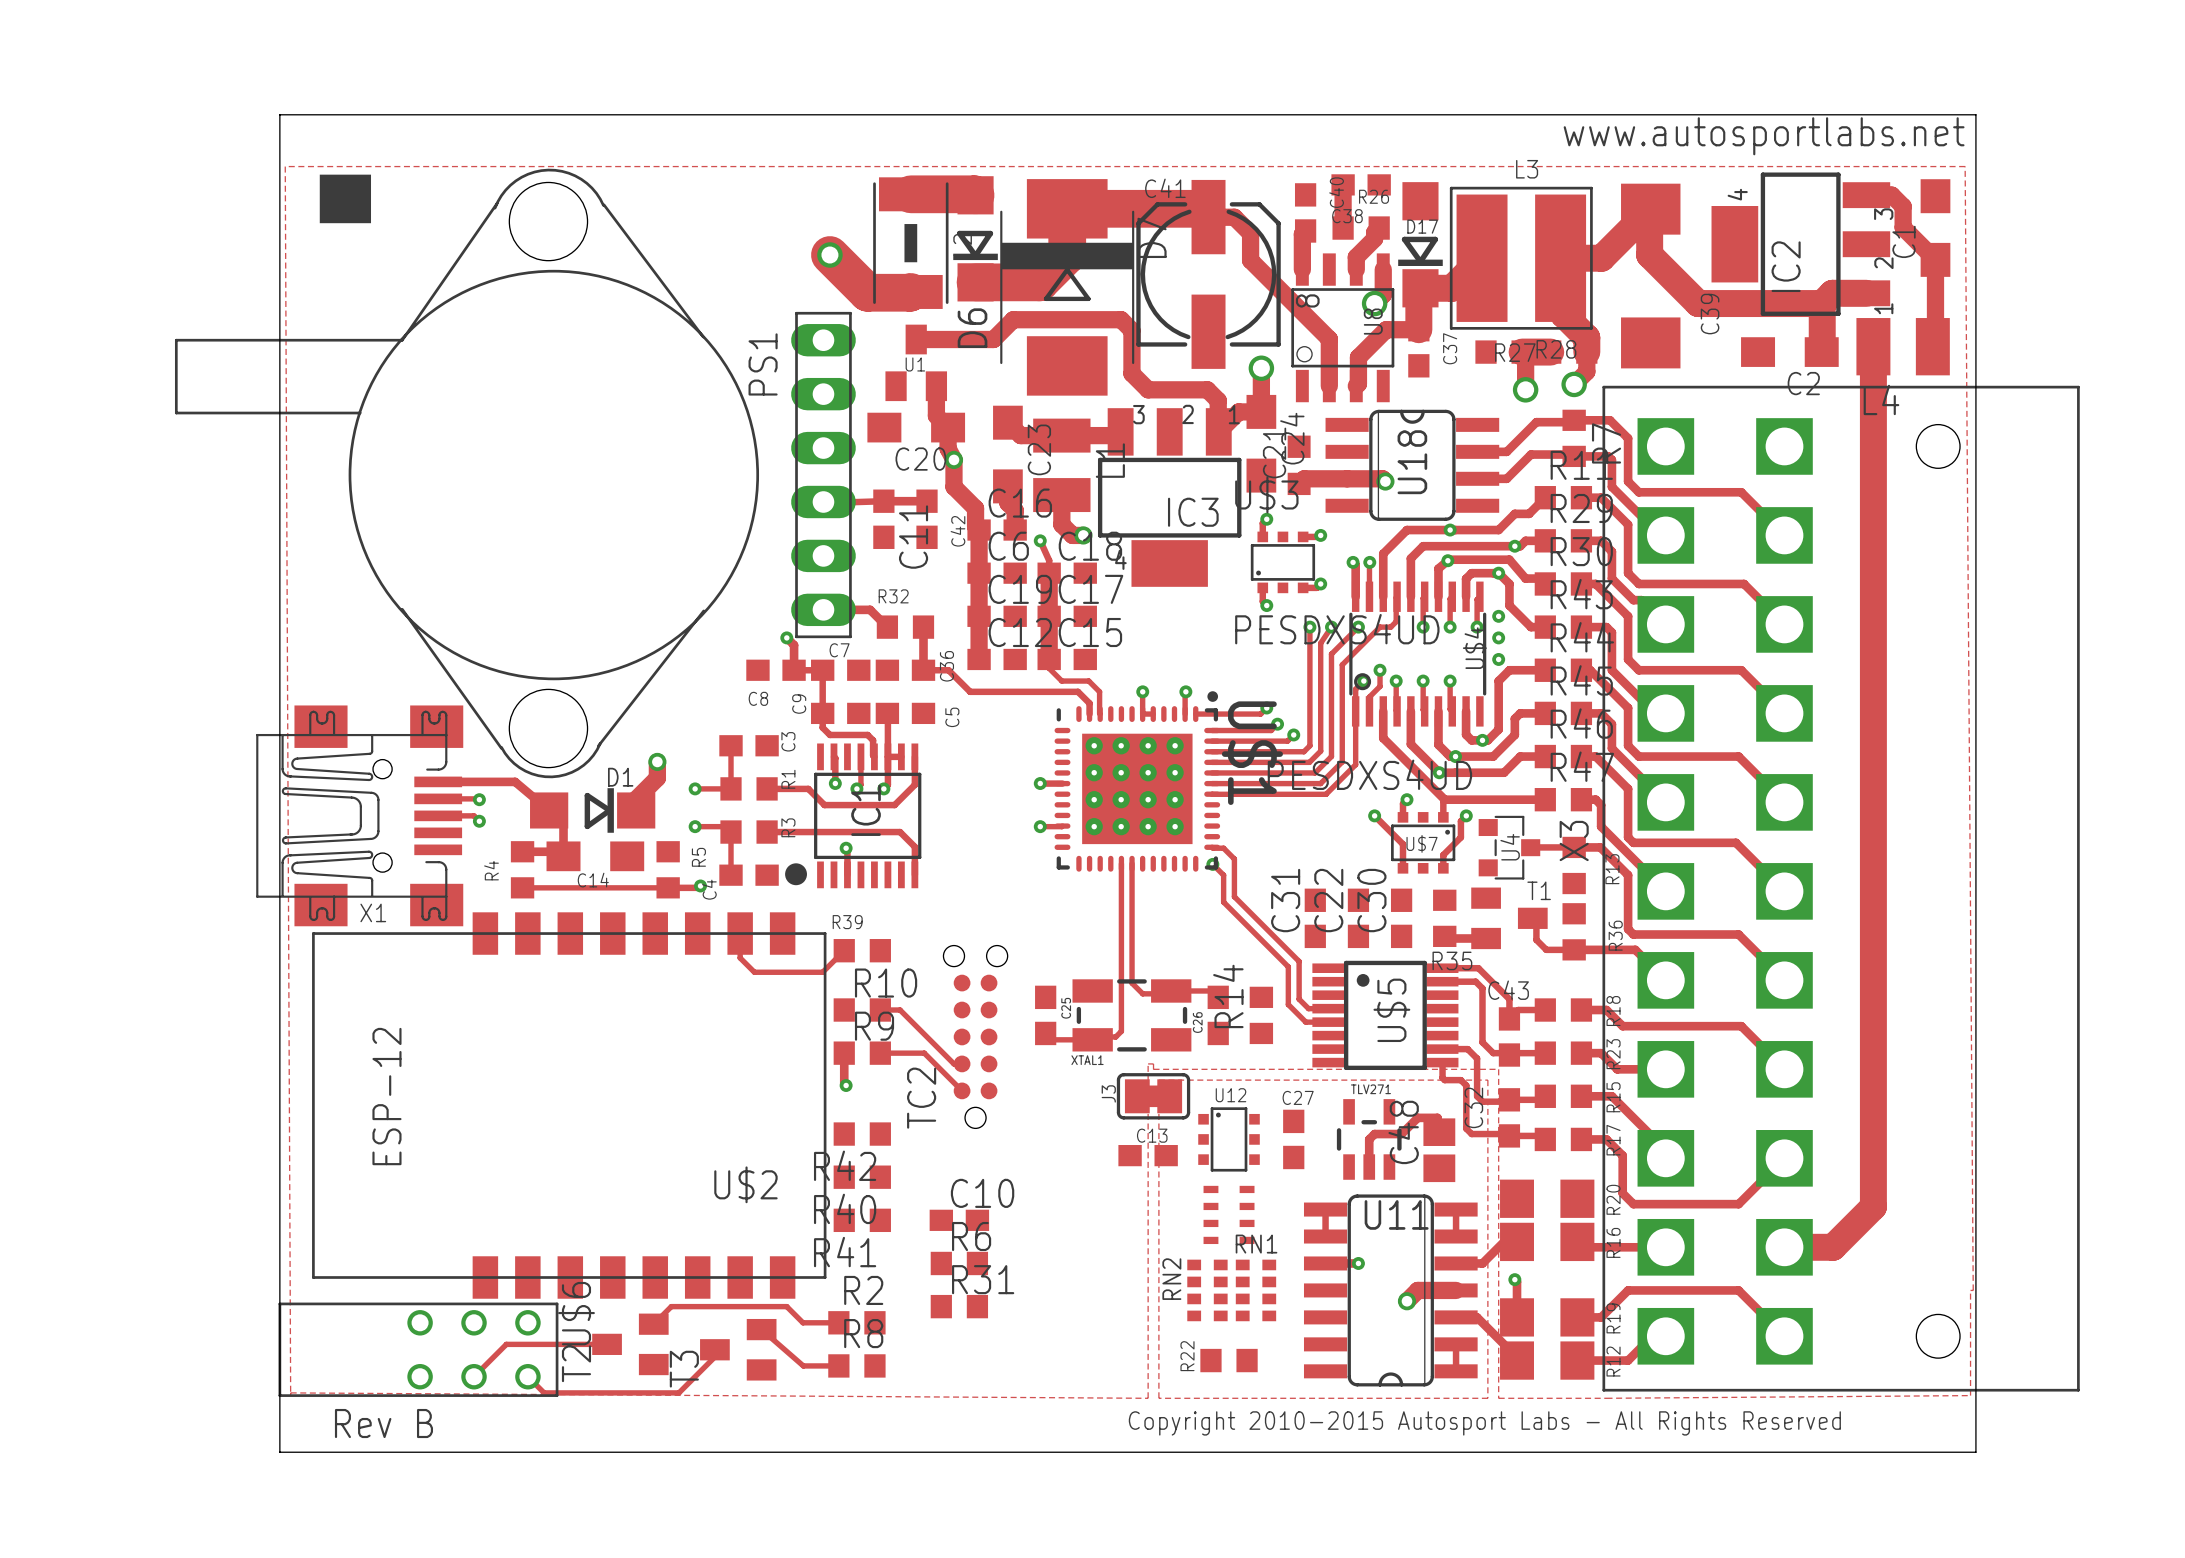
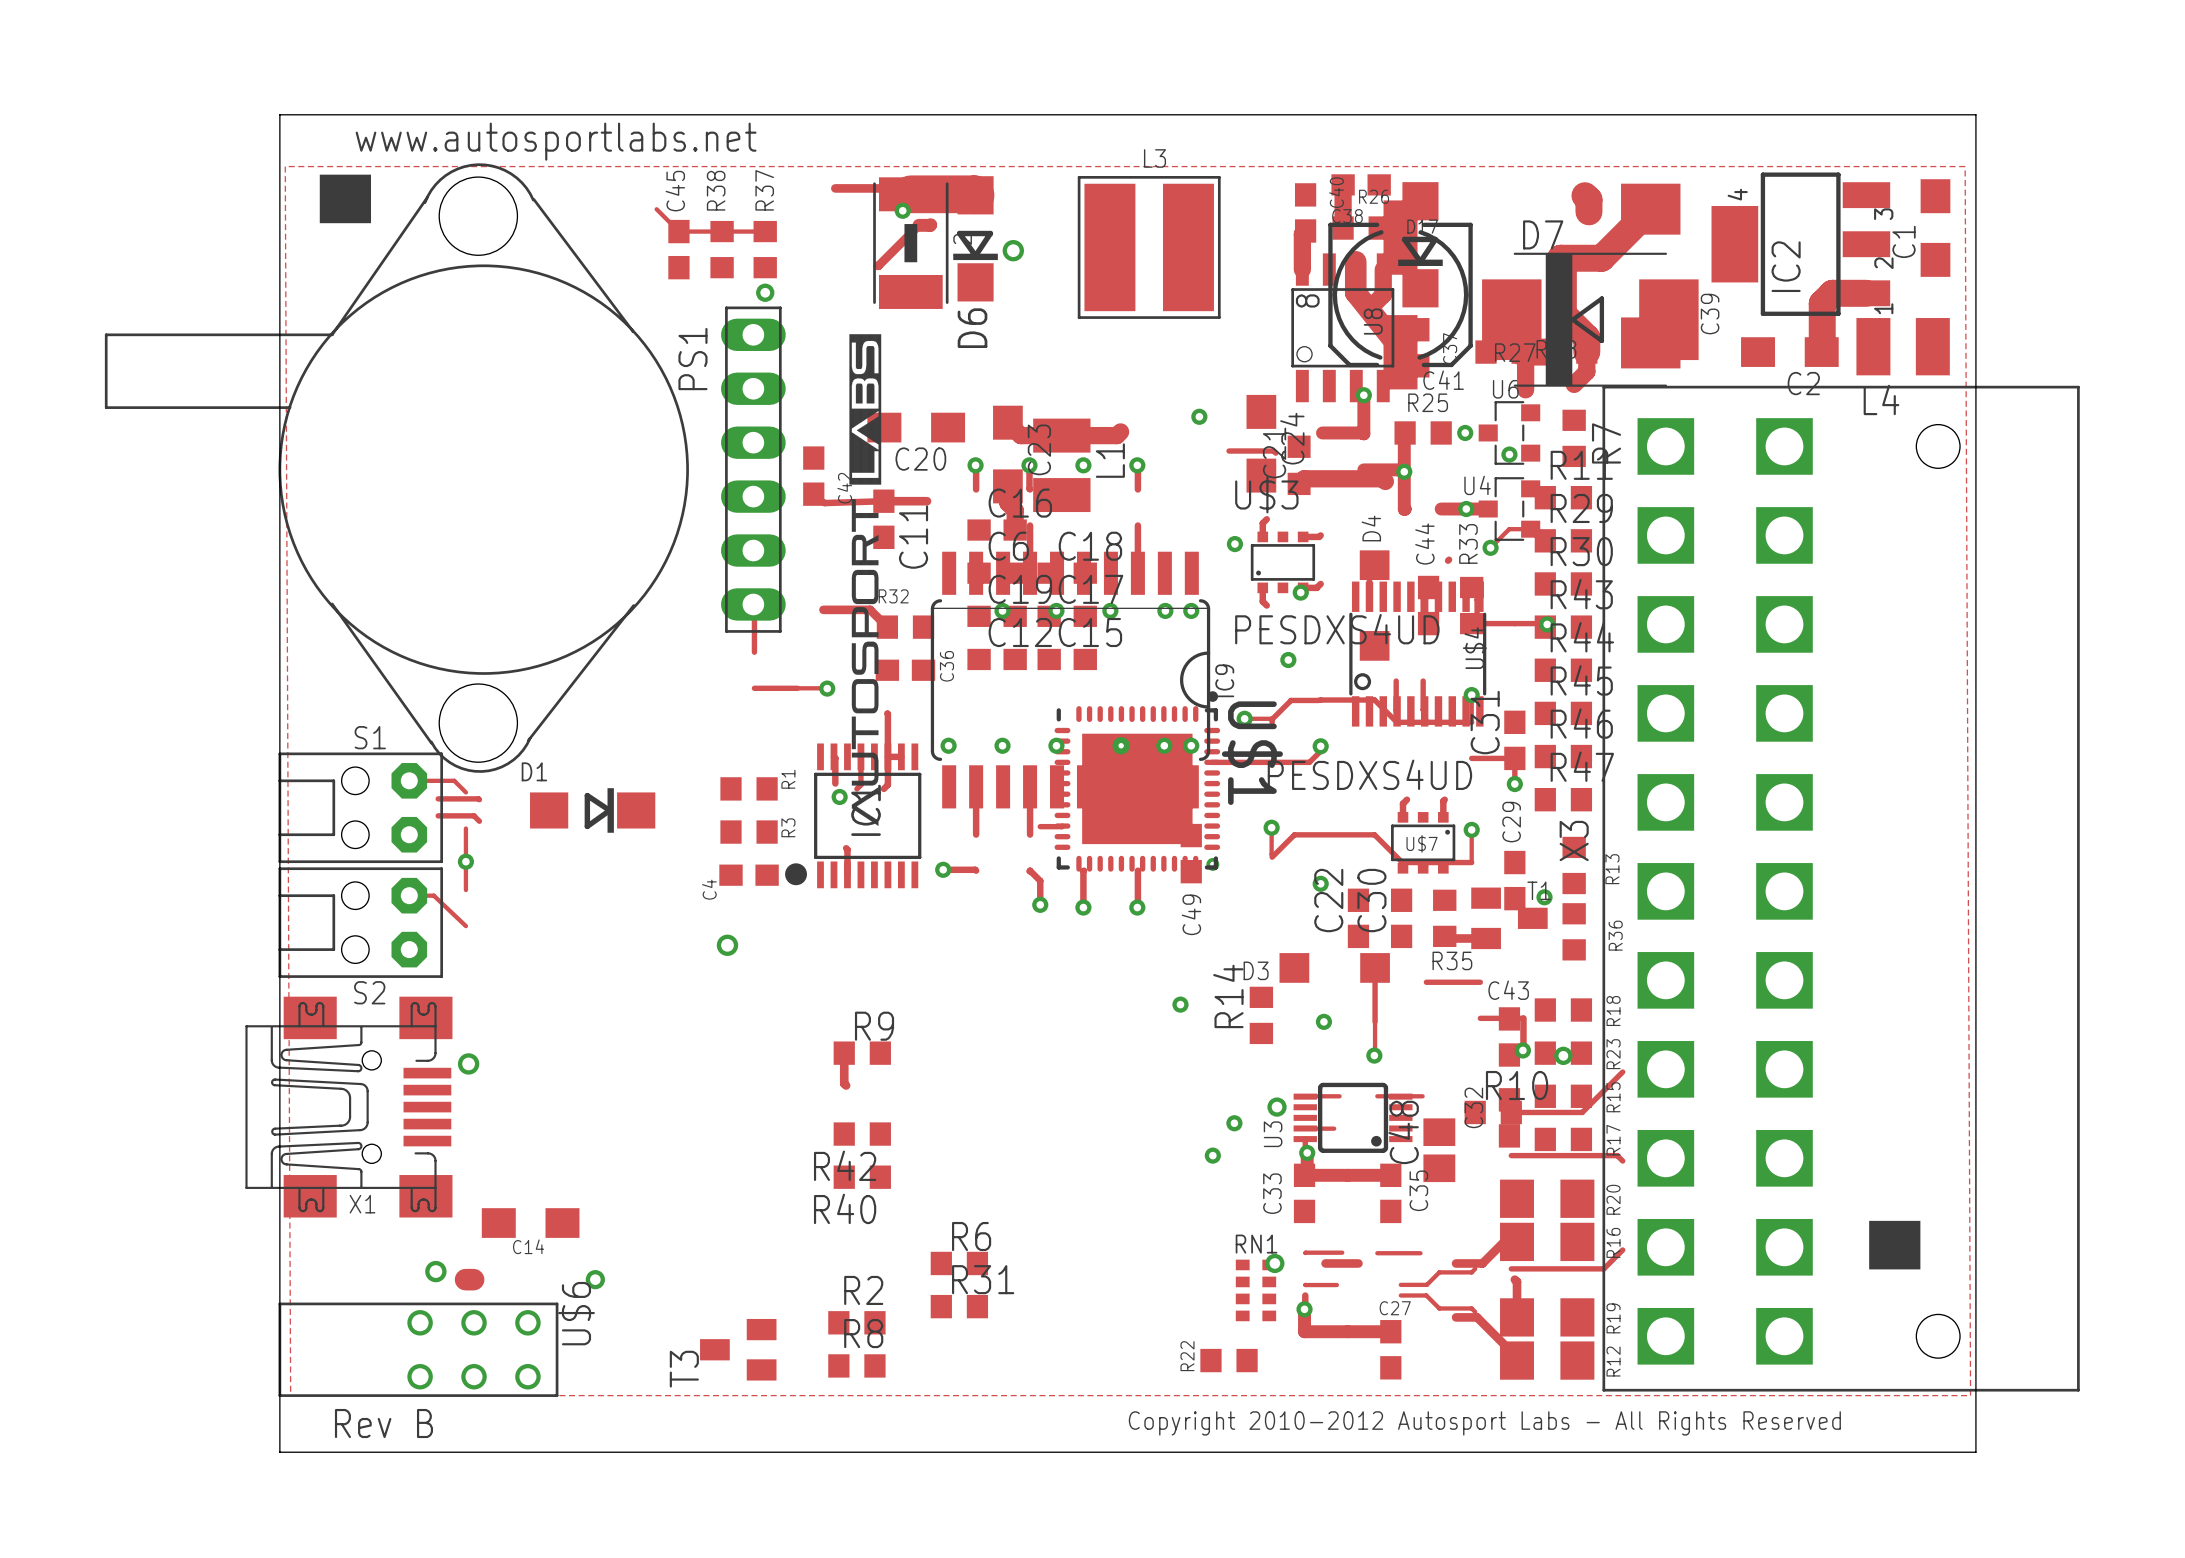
text: www.autosportlabs.net (1764, 136) -> none
text: none -> www.autosportlabs.net (556, 141)
zone outline: (1965, 166) (1973, 1290) (1970, 1290) (1970, 1395) (1498, 1398) (1498, 1069) (1153, 1069) (1153, 1063) (1148, 1063) (1148, 1398) (290, 1392) (290, 1395) -> (1965, 166) (1970, 1395) (290, 1395)
track: none -> (835, 188) (921, 188) (930, 197)
track: none -> (1584, 195) (1588, 199) (1588, 211)
track: (1866, 195) (1891, 195) (1903, 206) (1903, 227) (1935, 259) (1935, 344) (1932, 346) -> none
track: none -> (656, 209) (678, 231) (765, 231)
via: none -> (902, 210)
track: (1649, 210) (1649, 255) (1698, 303) (1822, 303) -> none
track: (1208, 217) (1200, 208) (1067, 208) (1067, 255) (1039, 282) (975, 282) -> none
track: (1208, 217) (1234, 217) (1250, 233) (1250, 260) (1329, 339) (1329, 386) -> none
track: none -> (930, 224) (918, 225) (877, 265)
track: (1379, 228) (1374, 232) (1374, 238) (1356, 257) (1356, 269) -> none
C45: none -> (678, 249)
R38: none -> (722, 249)
R37: none -> (765, 249)
via: none -> (1013, 250)
track: (829, 255) (867, 292) (910, 291) -> none
via: (829, 255) -> none
track: (1482, 258) (1451, 288) (1420, 288) (1418, 289) (1418, 329) (1386, 329) (1358, 357) (1358, 383) (1356, 386) -> none
L3 position: (1521, 258) -> (1149, 247)
track: none -> (1355, 261) (1355, 292) (1397, 345) (1400, 352)
C41 rotation: 0° (1208, 274) -> 180° (1400, 294)
C41 position: (1208, 274) -> (1400, 294)
D7 rotation: 0° (1067, 287) -> 90° counterclockwise (1590, 319)
D7 position: (1067, 287) -> (1590, 319)
via: none -> (765, 292)
via: (1374, 303) -> none
drawing: none -> [849, 334, 882, 827]
track: (916, 339) (993, 339) (1013, 319) (1121, 319) (1131, 330) (1131, 373) (1148, 389) (1207, 389) (1218, 400) (1218, 431) (1238, 411) (1261, 411) (1261, 368) -> none
track: (1873, 346) (1873, 1206) (1833, 1247) (1784, 1247) -> none
U1: (916, 362) -> none
via: (1261, 368) -> none
via: (1574, 384) -> none
track: (936, 386) (936, 415) (948, 427) (948, 448) (953, 459) (953, 486) (975, 508) (975, 526) (979, 530) (979, 659) -> none
via: (1525, 389) -> none
track: none -> (1363, 395) (1363, 433) (1322, 432)
via: none -> (1363, 395)
via: none -> (1199, 416)
track: none -> (1405, 432) (1404, 509)
R25: none -> (1423, 432)
via: none -> (1465, 432)
U6: none -> (1509, 432)
track: none -> (1229, 451) (1273, 451) (1275, 453)
track: (1477, 451) (1506, 451) (1536, 422) (1610, 420) (1628, 438) (1628, 481) (1638, 492) (1741, 492) (1784, 535) -> none
via: none -> (1509, 454)
via: (953, 459) -> none
track: none -> (975, 465) (976, 463) (976, 489)
via: none -> (975, 465)
track: none -> (1029, 465) (1030, 489)
via: none -> (1029, 465)
via: none -> (1083, 465)
track: none -> (1137, 465) (1137, 463) (1137, 489)
via: none -> (1137, 465)
U18: (1412, 465) -> none
track: none -> (1363, 469) (1402, 469) (1404, 471)
via: none -> (1404, 471)
PS1 position: (515, 473) -> (445, 468)
track: (1477, 478) (1506, 478) (1531, 454) (1608, 456) (1611, 459) (1611, 486) (1644, 519) (1649, 519) (1665, 535) -> none
via: (1385, 481) -> none
track: (1061, 495) (1061, 524) (1072, 535) (1083, 535) -> none
IC3: (1169, 497) -> none
track: (1545, 497) (1529, 513) (1514, 513) (1498, 530) (1406, 530) (1383, 553) (1383, 596) -> none
track: (1581, 497) (1601, 497) (1628, 524) (1628, 573) (1638, 583) (1744, 583) (1784, 624) -> none
track: none -> (1441, 509) (1488, 509)
via: none -> (1466, 509)
C42 position: (927, 519) -> (813, 476)
via: (1266, 519) -> none
track: none -> (1030, 525) (1030, 573)
track: none -> (1137, 525) (1137, 573)
track: none -> (1530, 529) (1509, 529) (1490, 547)
via: (1450, 530) -> none
via: (1083, 535) -> none
via: (1320, 535) -> none
track: (1040, 540) (1049, 560) (1049, 668) (1061, 681) (1088, 681) (1099, 691) (1100, 714) -> none
via: (1040, 540) -> none
track: (1545, 540) (1525, 540) (1520, 546) (1423, 546) (1410, 558) (1410, 596) -> none
track: (1581, 540) (1601, 540) (1611, 551) (1611, 578) (1633, 600) (1641, 600) (1665, 624) -> none
via: none -> (1234, 544)
via: (1514, 546) -> none
via: none -> (1490, 547)
via: (1447, 560) -> none
track: (1353, 562) (1355, 565) (1355, 596) -> none
via: (1353, 562) -> none
via: (1369, 562) -> none
via: (1498, 573) -> none
via: (1320, 583) -> none
track: (1545, 583) (1539, 578) (1525, 578) (1509, 559) (1449, 559) (1438, 568) (1438, 596) -> none
track: (1581, 583) (1595, 583) (1628, 616) (1628, 659) (1638, 670) (1741, 670) (1784, 713) -> none
via: none -> (1300, 592)
track: (1397, 596) (1396, 621) (1390, 627) (1380, 627) (1342, 664) (1342, 761) (1320, 783) (1212, 783) -> none
track: (1452, 596) (1450, 598) (1450, 627) -> none
track: (1466, 596) (1466, 578) (1471, 573) (1498, 573) (1509, 583) (1509, 605) (1531, 627) (1545, 627) -> none
track: none -> (753, 604) (754, 652)
via: (1266, 605) -> none
D4: none -> (1374, 605)
C44: none -> (1428, 605)
R33: none -> (1471, 605)
via: none -> (1002, 610)
via: none -> (1056, 610)
via: none -> (1110, 610)
via: none -> (1165, 610)
via: none -> (1191, 610)
via: (1498, 616) -> none
track: none -> (1471, 623) (1547, 624)
via: none -> (1547, 624)
track: (923, 627) (923, 670) (948, 670) (970, 691) (1078, 691) (1089, 703) (1089, 714) -> none
track: (1309, 627) (1309, 745) (1303, 751) (1212, 751) -> none
via: (1309, 627) -> none
track: (1331, 627) (1320, 643) (1320, 746) -> none
via: (1331, 627) -> none
track: (1358, 627) (1331, 654) (1331, 756) (1315, 772) (1212, 772) -> none
via: (1358, 627) -> none
via: (1423, 627) -> none
via: (1450, 627) -> none
via: (1477, 627) -> none
track: (1581, 627) (1606, 627) (1611, 632) (1611, 670) (1649, 708) (1660, 708) (1665, 713) -> none
track: (786, 637) (794, 645) (794, 670) (822, 670) (822, 727) (829, 734) (867, 734) (873, 740) (874, 756) -> none
via: (786, 637) -> none
via: (1498, 637) -> none
via: (1498, 659) -> none
via: none -> (1288, 660)
C8: (776, 670) -> none
C7: (840, 670) -> none
track: (1380, 670) (1380, 686) (1369, 697) (1369, 711) -> none
via: (1380, 670) -> none
track: (1545, 670) (1509, 670) (1498, 681) (1498, 729) (1487, 740) (1471, 740) (1466, 734) (1466, 711) -> none
track: (1581, 670) (1590, 670) (1628, 708) (1628, 745) (1638, 756) (1738, 756) (1784, 802) -> none
IC9: none -> (1070, 680)
track: (1363, 681) (1355, 689) (1355, 764) (1326, 794) (1212, 794) -> none
via: (1363, 681) -> none
via: (1396, 681) -> none
via: (1423, 681) -> none
track: (1450, 681) (1450, 709) (1452, 711) -> none
via: (1450, 681) -> none
track: none -> (754, 688) (826, 688)
via: none -> (827, 688)
track: (1142, 691) (1142, 714) (1153, 714) -> none
via: (1142, 691) -> none
track: (1185, 691) (1185, 714) -> none
via: (1185, 691) -> none
track: none -> (1471, 695) (1471, 722) (1396, 722) (1374, 700) (1291, 700) (1272, 719) (1272, 722) (1270, 718) (1244, 718)
via: none -> (1471, 695)
track: (1266, 708) (1260, 714) (1195, 714) -> none
via: (1266, 708) -> none
track: (1383, 711) (1383, 738) (1444, 799) (1545, 799) -> none
track: (1410, 711) (1410, 744) (1439, 772) (1504, 772) (1520, 756) (1545, 756) -> none
track: (1438, 711) (1438, 744) (1450, 756) (1493, 756) (1514, 734) (1514, 718) (1520, 713) (1545, 713) -> none
C9: (840, 713) -> none
C5: (905, 713) -> none
track: (1581, 713) (1601, 713) (1611, 724) (1611, 748) (1665, 802) -> none
via: none -> (1244, 718)
track: (1277, 724) (1271, 730) (1212, 730) -> none
via: (1277, 724) -> none
track: (1293, 734) (1287, 741) (1212, 741) -> none
via: (1293, 734) -> none
via: (1482, 740) -> none
track: (731, 745) (731, 788) (695, 788) -> none
C3: (749, 745) -> none
via: none -> (948, 745)
via: none -> (1002, 745)
via: none -> (1056, 745)
via: (1094, 745) -> none
via: (1148, 745) -> none
via: none -> (1164, 745)
via: (1175, 745) -> none
via: none -> (1191, 745)
via: none -> (1320, 746)
track: (914, 756) (914, 784) (894, 805) (824, 805) (808, 788) (767, 788) -> none
via: (1455, 756) -> none
track: (1581, 756) (1595, 756) (1628, 788) (1628, 837) (1633, 842) (1735, 842) (1784, 891) -> none
track: none -> (1471, 758) (1514, 758) (1514, 784)
track: (657, 761) (657, 778) (636, 799) (636, 810) -> none
via: (657, 761) -> none
via: (1094, 772) -> none
via: (1121, 772) -> none
via: (1148, 772) -> none
via: (1175, 772) -> none
via: (1439, 772) -> none
D1 name position: D1 (620, 777) -> D1 (534, 771)
track: none -> (409, 780) (454, 780) (465, 792)
track: (438, 781) (515, 781) (549, 810) (563, 819) (563, 856) (562, 851) (522, 851) -> none
via position: (835, 783) -> (839, 796)
track: (1040, 783) (1062, 783) -> none
via: (1040, 783) -> none
via: none -> (1514, 784)
track: none -> (976, 786) (976, 834)
track: none -> (1030, 786) (1030, 834)
via: (695, 788) -> none
via: (856, 788) -> none
via: (883, 788) -> none
via: (479, 799) -> none
via: (1094, 799) -> none
via: (1121, 799) -> none
via: (1148, 799) -> none
via: (1175, 799) -> none
via: (1406, 799) -> none
track: (1581, 799) (1595, 799) (1601, 805) (1601, 826) (1665, 891) -> none
S1: none -> (360, 807)
X1 position: (359, 815) -> (348, 1107)
track: (1374, 815) (1402, 844) (1402, 868) -> none
via: (1374, 815) -> none
track: (1466, 815) (1460, 821) (1460, 837) (1443, 855) (1443, 868) -> none
via position: (1466, 815) -> (1471, 829)
via: (479, 821) -> none
track: (695, 826) (725, 826) (731, 832) (731, 875) -> none
via: (695, 826) -> none
via: (1040, 826) -> none
via: (1094, 826) -> none
via: (1121, 826) -> none
via: (1148, 826) -> none
via: (1175, 826) -> none
track: none -> (1271, 827) (1272, 857) (1294, 834) (1374, 834) (1402, 862) (1471, 862) (1471, 829)
via: none -> (1271, 827)
track: none -> (465, 828) (465, 890)
track: (767, 832) (900, 832) (914, 846) (914, 874) -> none
track: (1212, 847) (1223, 848) (1234, 859) (1234, 896) (1299, 961) (1299, 999) (1308, 1008) (1328, 1008) -> none
U4 rotation: 0° (1509, 847) -> 180° (1509, 509)
U4 position: (1509, 847) -> (1509, 509)
track: (1530, 847) (1600, 847) (1628, 875) (1628, 929) (1633, 934) (1738, 934) (1784, 980) -> none
via: (846, 848) -> none
C49: none -> (1191, 853)
C14 position: (595, 856) -> (530, 1223)
via: none -> (465, 861)
track: (1121, 863) (1121, 1031) (1115, 1036) (1095, 1036) (1092, 1039) (1052, 1039) (1045, 1033) -> none
track: (1132, 863) (1132, 983) (1142, 993) (1168, 993) (1171, 990) (1211, 990) (1218, 997) -> none
track: (1212, 864) (1223, 875) (1223, 902) (1288, 966) (1288, 1004) (1305, 1022) (1328, 1022) -> none
R4: (522, 869) -> none
R5: (668, 869) -> none
track: none -> (943, 869) (976, 870)
via: none -> (943, 869)
track: none -> (1083, 870) (1083, 907)
track: none -> (1137, 870) (1137, 907)
track: none -> (1029, 871) (1040, 880) (1040, 904)
C29: none -> (1514, 880)
via: none -> (1320, 883)
track: (700, 885) (698, 887) (522, 887) -> none
via: (700, 885) -> none
track: none -> (409, 895) (433, 895) (465, 926)
via: none -> (1544, 897)
via: none -> (1040, 904)
via: none -> (1083, 907)
via: none -> (1137, 907)
C31 position: (1315, 918) -> (1514, 740)
track: (1532, 918) (1536, 921) (1536, 939) (1546, 949) (1635, 949) (1665, 980) -> none
S2: none -> (360, 922)
track: (740, 933) (740, 957) (754, 972) (822, 972) (844, 950) -> none
via: none -> (727, 945)
R39: (862, 950) -> none
D3: none -> (1334, 967)
track: none -> (1375, 967) (1374, 1055)
track: (1442, 968) (1478, 968) (1509, 999) (1509, 1018) (1518, 1010) (1545, 1010) -> none
track: (1442, 981) (1475, 981) (1482, 988) (1482, 1042) (1493, 1053) (1507, 1053) (1509, 1055) (1511, 1053) (1545, 1053) -> none
track: none -> (1426, 982) (1480, 982)
via: none -> (1180, 1004)
R10 position: (862, 1010) -> (1493, 1112)
track: (880, 1010) (900, 1010) (953, 1063) (962, 1063) -> none
track: (1581, 1010) (1606, 1010) (1622, 1026) (1741, 1026) (1784, 1069) -> none
C25: (1045, 1015) -> none
XTAL1: (1131, 1015) -> none
C26: (1218, 1015) -> none
U$5: (1385, 1015) -> none
track: none -> (1480, 1018) (1523, 1018) (1522, 1050)
via: none -> (1323, 1021)
TC2: (975, 1036) -> none
track: (1442, 1049) (1467, 1049) (1477, 1058) (1477, 1096) (1482, 1101) (1541, 1099) (1545, 1096) -> none
via: none -> (1522, 1050)
track: (880, 1053) (924, 1053) (962, 1090) -> none
track: (1581, 1053) (1601, 1053) (1617, 1069) (1665, 1069) -> none
via: none -> (1374, 1055)
via: none -> (1563, 1055)
track: (1442, 1062) (1442, 1077) (1444, 1080) (1460, 1080) (1466, 1085) (1466, 1128) (1471, 1134) (1541, 1135) (1545, 1139) -> none
via: none -> (468, 1063)
track: none -> (1622, 1072) (1582, 1112) (1511, 1112)
zone outline: (1158, 1080) (1158, 1398) (1487, 1398) (1487, 1080) (1158, 1080) -> none
via: (846, 1085) -> none
J3: (1153, 1096) -> none
track: none -> (1339, 1096) (1305, 1096)
track: none -> (1377, 1096) (1422, 1096)
track: (1581, 1096) (1611, 1096) (1665, 1150) (1665, 1158) -> none
U$2: (569, 1105) -> none
via: none -> (1277, 1107)
U3: none -> (1353, 1117)
via: none -> (1234, 1123)
track: none -> (1305, 1128) (1334, 1128)
track: (1439, 1132) (1437, 1117) (1417, 1117) (1401, 1134) (1374, 1134) (1369, 1139) (1369, 1167) -> none
U12: (1229, 1139) -> none
C27 position: (1293, 1139) -> (1390, 1349)
track: none -> (1305, 1139) (1307, 1172) (1304, 1175) (1390, 1175)
TLV271: (1369, 1139) -> none
track: (1581, 1139) (1606, 1139) (1622, 1155) (1622, 1193) (1633, 1204) (1738, 1204) (1784, 1158) -> none
via: none -> (1307, 1152)
C13: (1148, 1155) -> none
via: none -> (1212, 1155)
track: none -> (1511, 1155) (1617, 1155) (1622, 1161)
C33: none -> (1304, 1193)
C35: none -> (1390, 1193)
track: (1325, 1209) (1325, 1236) -> none
track: (1456, 1209) (1456, 1236) -> none
part: (1229, 1214) -> none
R41: (862, 1220) -> none
C10: (959, 1220) -> none
drawing: none -> [1869, 1220, 1921, 1270]
track: (1577, 1241) (1582, 1247) (1665, 1247) -> none
track: none -> (1622, 1249) (1603, 1268) (1511, 1268)
track: none -> (1342, 1252) (1305, 1253)
track: none -> (1377, 1253) (1420, 1253)
via: none -> (1274, 1263)
via: (1358, 1263) -> none
track: none -> (1475, 1268) (1471, 1272) (1439, 1272) (1426, 1284) (1400, 1284)
via: none -> (435, 1271)
track: none -> (465, 1279) (473, 1279)
via: none -> (595, 1279)
via: (1514, 1279) -> none
track: none -> (1305, 1285) (1336, 1285)
RN2: (1207, 1290) -> none
U11: (1390, 1290) -> none
track: (1456, 1290) (1417, 1290) (1406, 1301) -> none
track: none -> (1305, 1295) (1304, 1331) (1390, 1331)
track: none -> (1400, 1295) (1426, 1295) (1439, 1308) (1471, 1308) (1475, 1312)
via: (1406, 1301) -> none
via: none -> (1304, 1309)
track: (1577, 1317) (1601, 1317) (1628, 1290) (1738, 1290) (1784, 1336) -> none
track: (838, 1322) (802, 1322) (786, 1306) (671, 1306) (653, 1324) -> none
track: (761, 1329) (803, 1365) (838, 1365) -> none
track: (1665, 1336) (1652, 1336) (1628, 1360) (1577, 1360) -> none
track: (607, 1344) (506, 1344) (474, 1376) -> none
T2: (630, 1344) -> none
track: (1456, 1344) (1456, 1371) -> none
track: (714, 1349) (714, 1356) (678, 1392) (544, 1392) (527, 1376) -> none
text: Copyright 2010-2015 Autosport Labs - All Rights Reserved (1484, 1423) -> Copyright 2010-2012 Autosport Labs - All Rights Reserved (1484, 1423)

